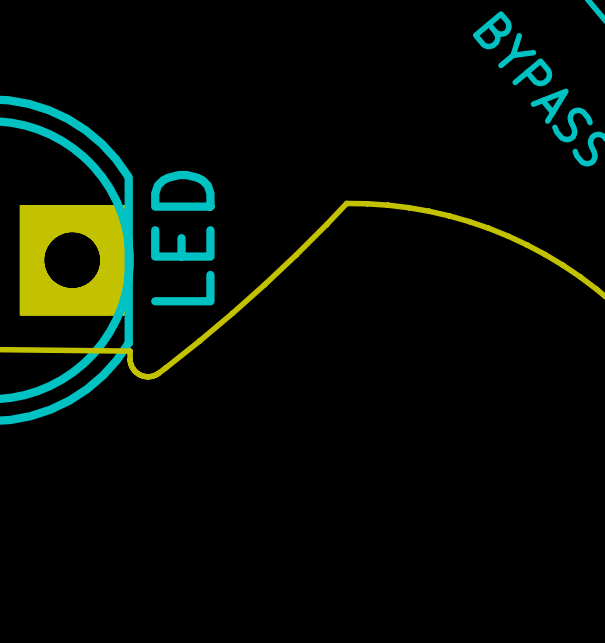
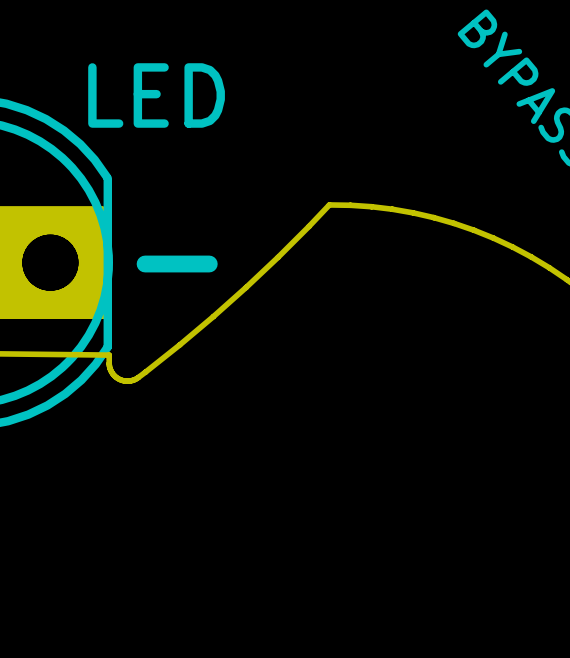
part value rotation: 0° (182, 238) -> 90° clockwise (156, 95)
text: none -> - (177, 264)

